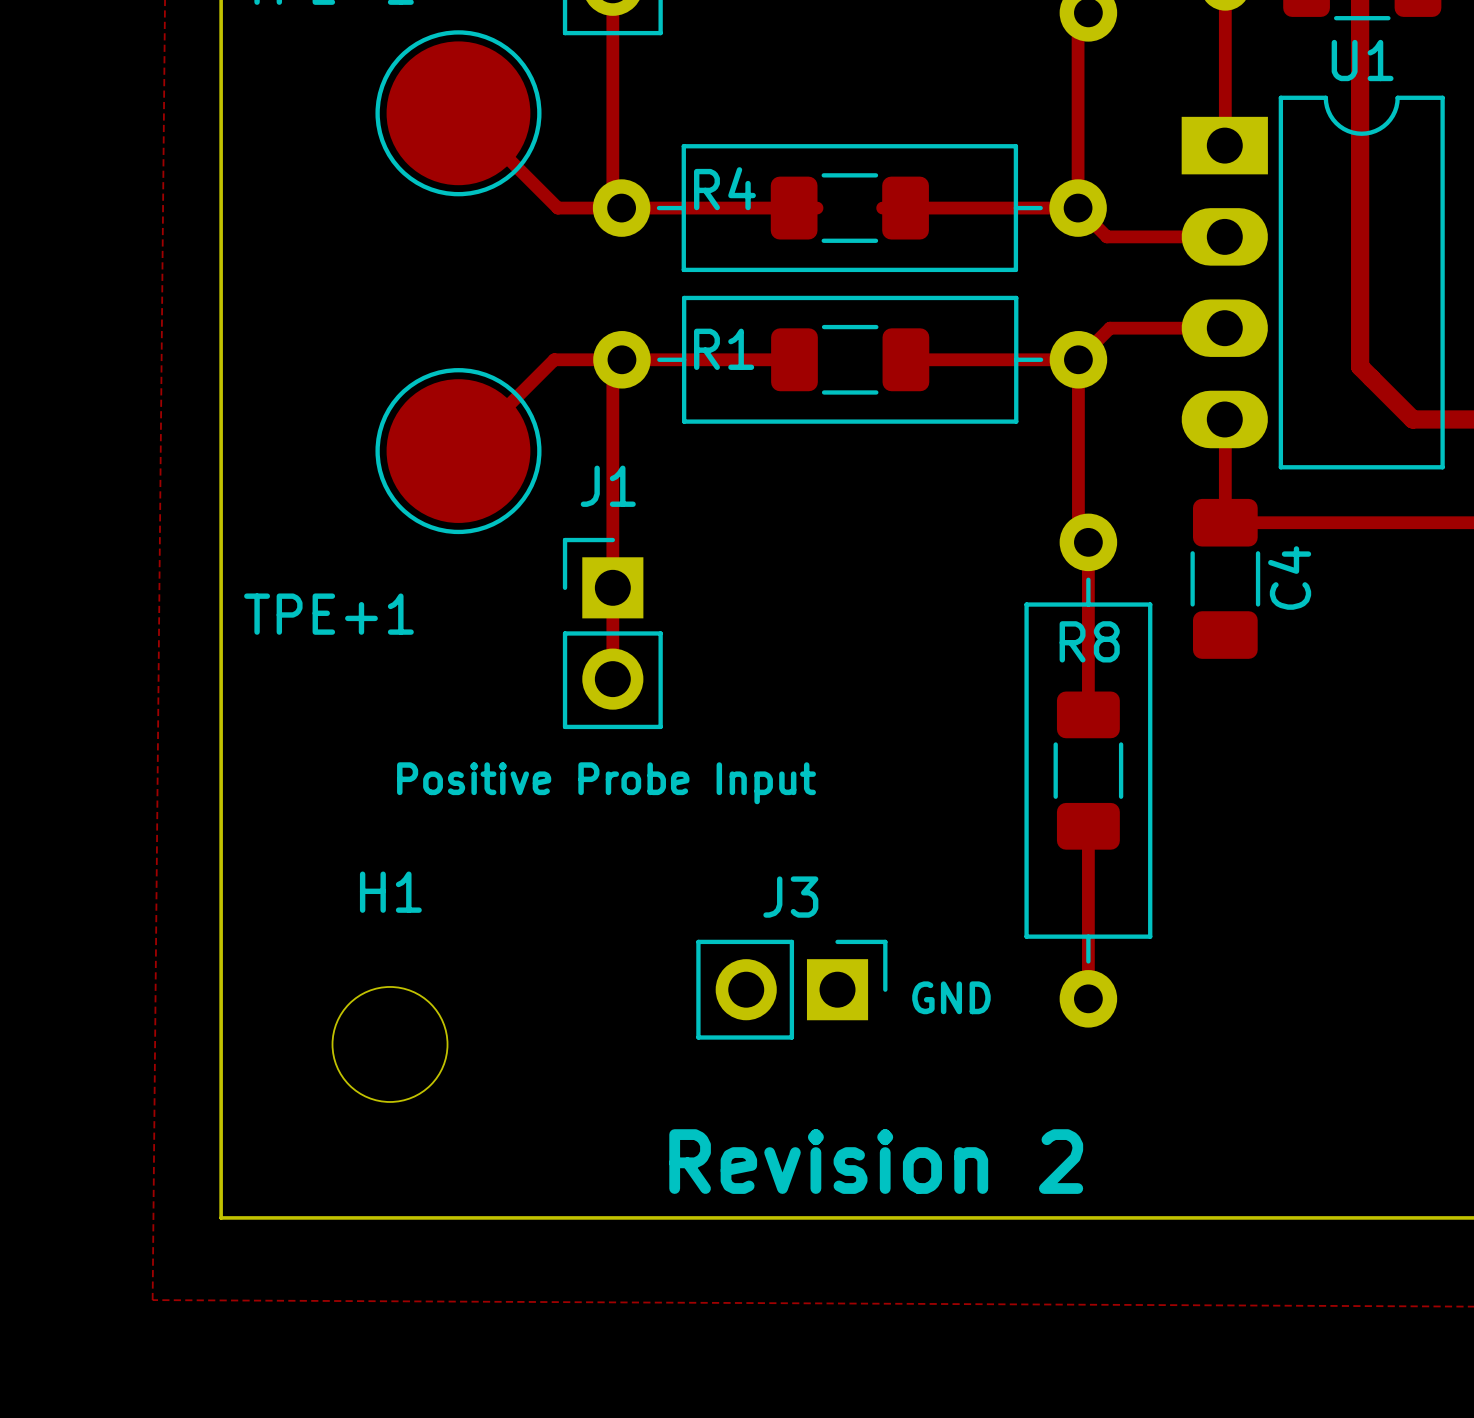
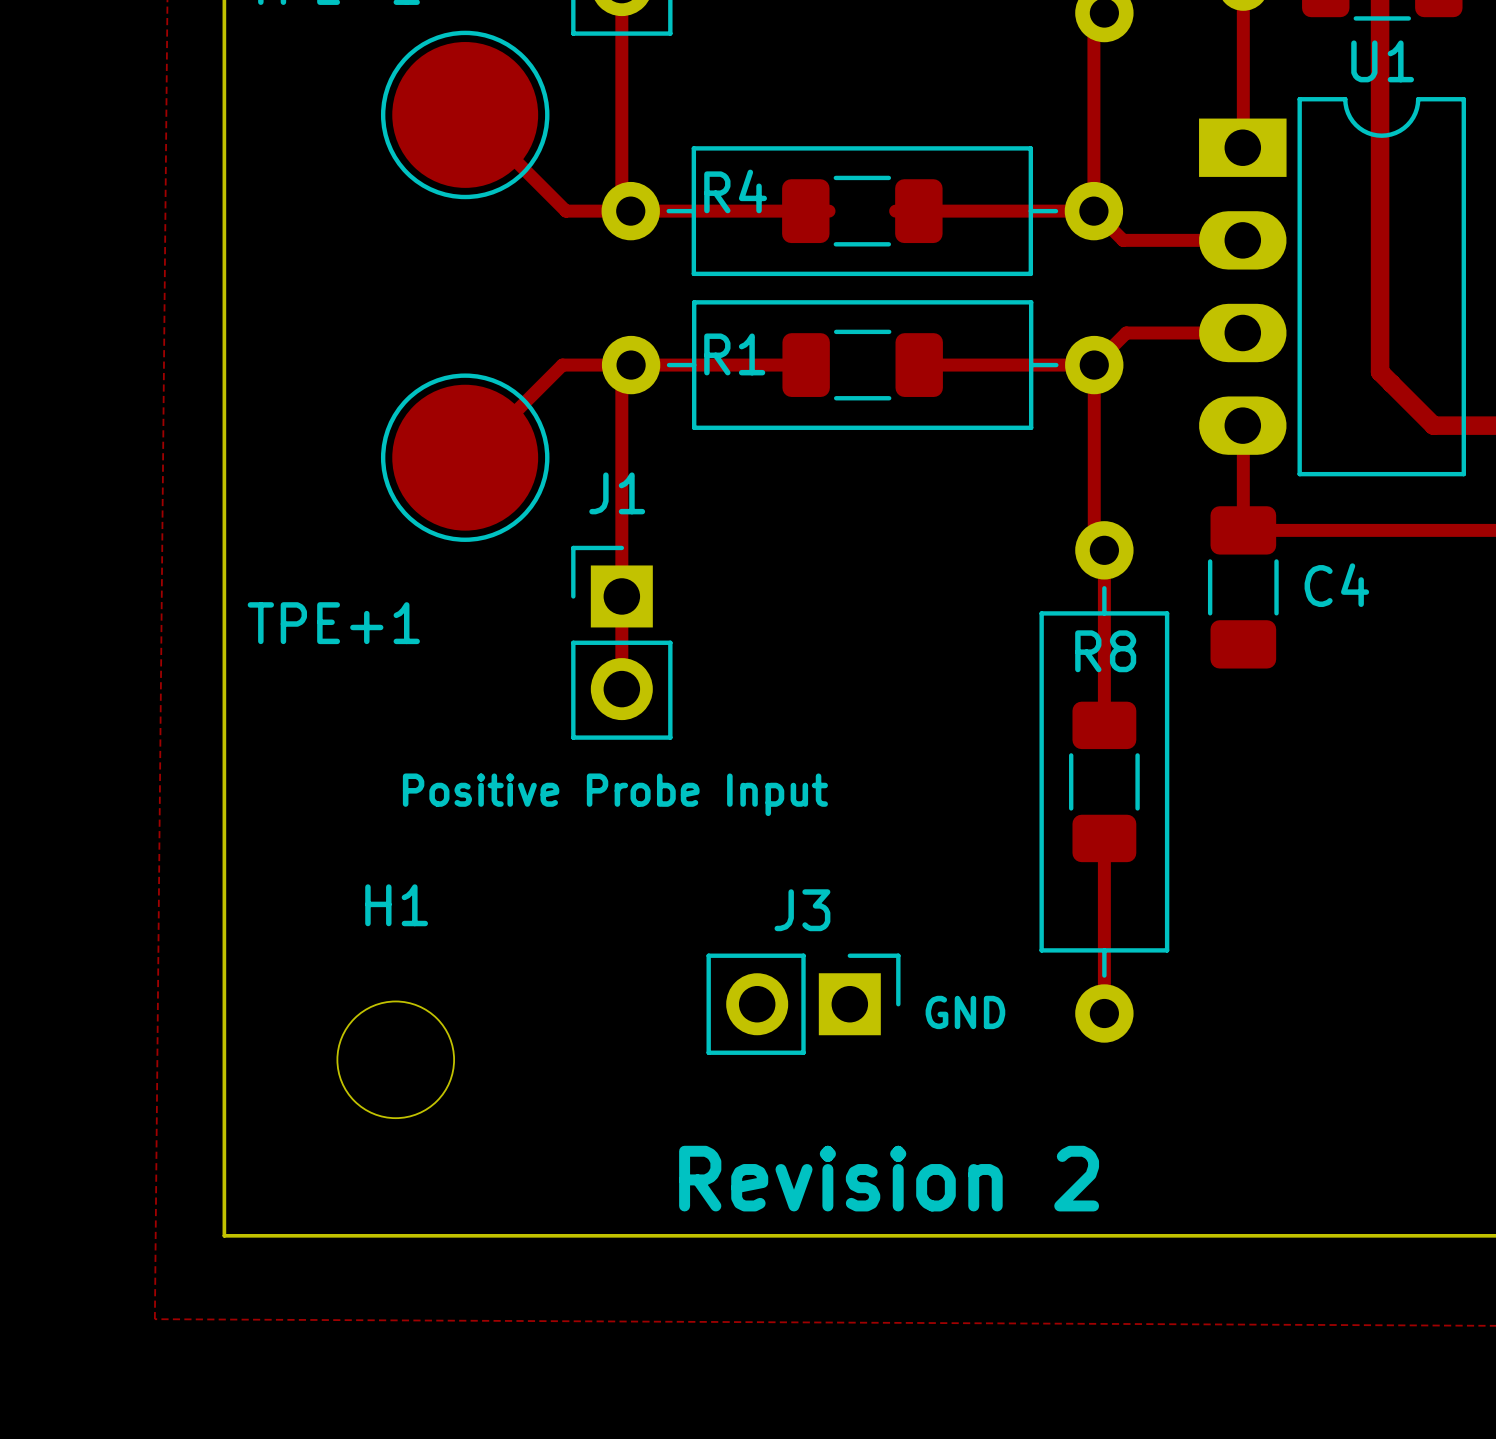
C4 name rotation: 0° (1289, 578) -> 90° clockwise (1336, 585)

